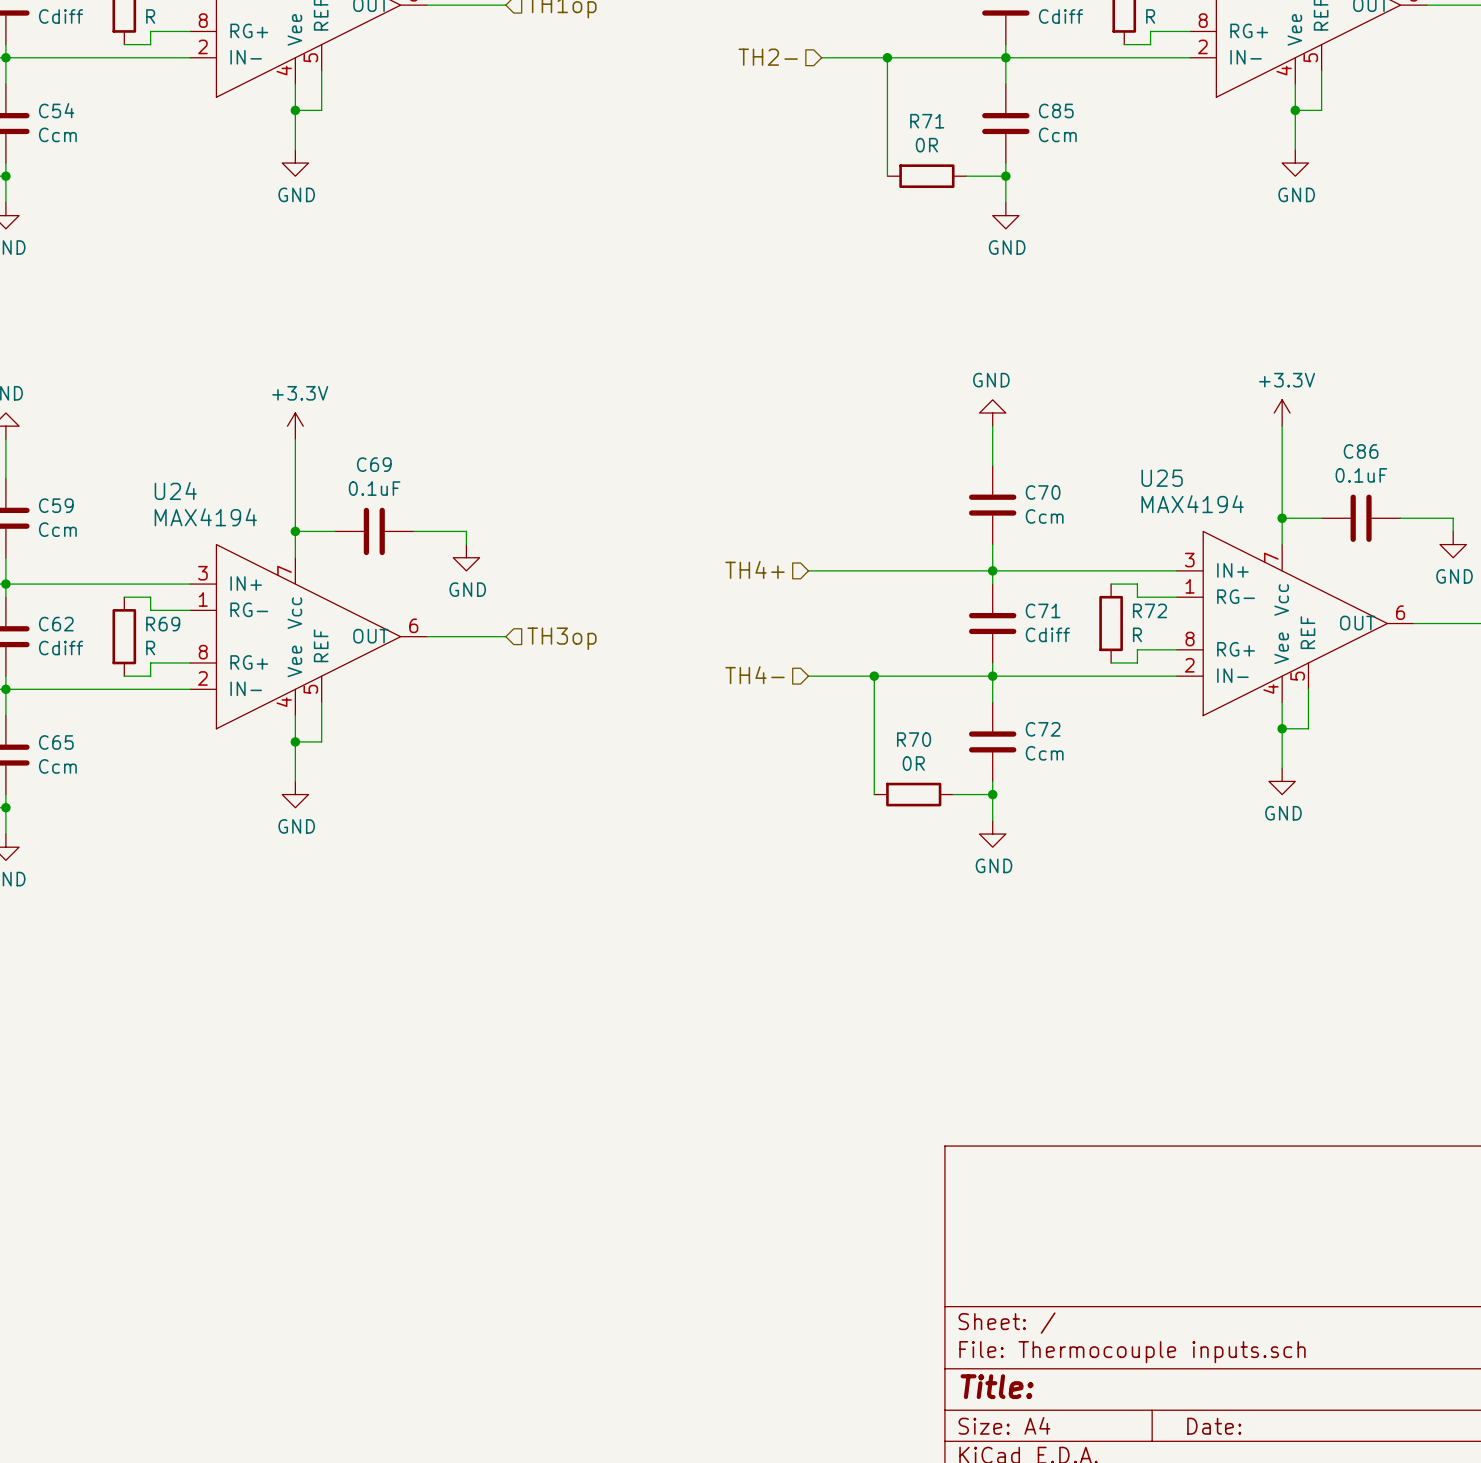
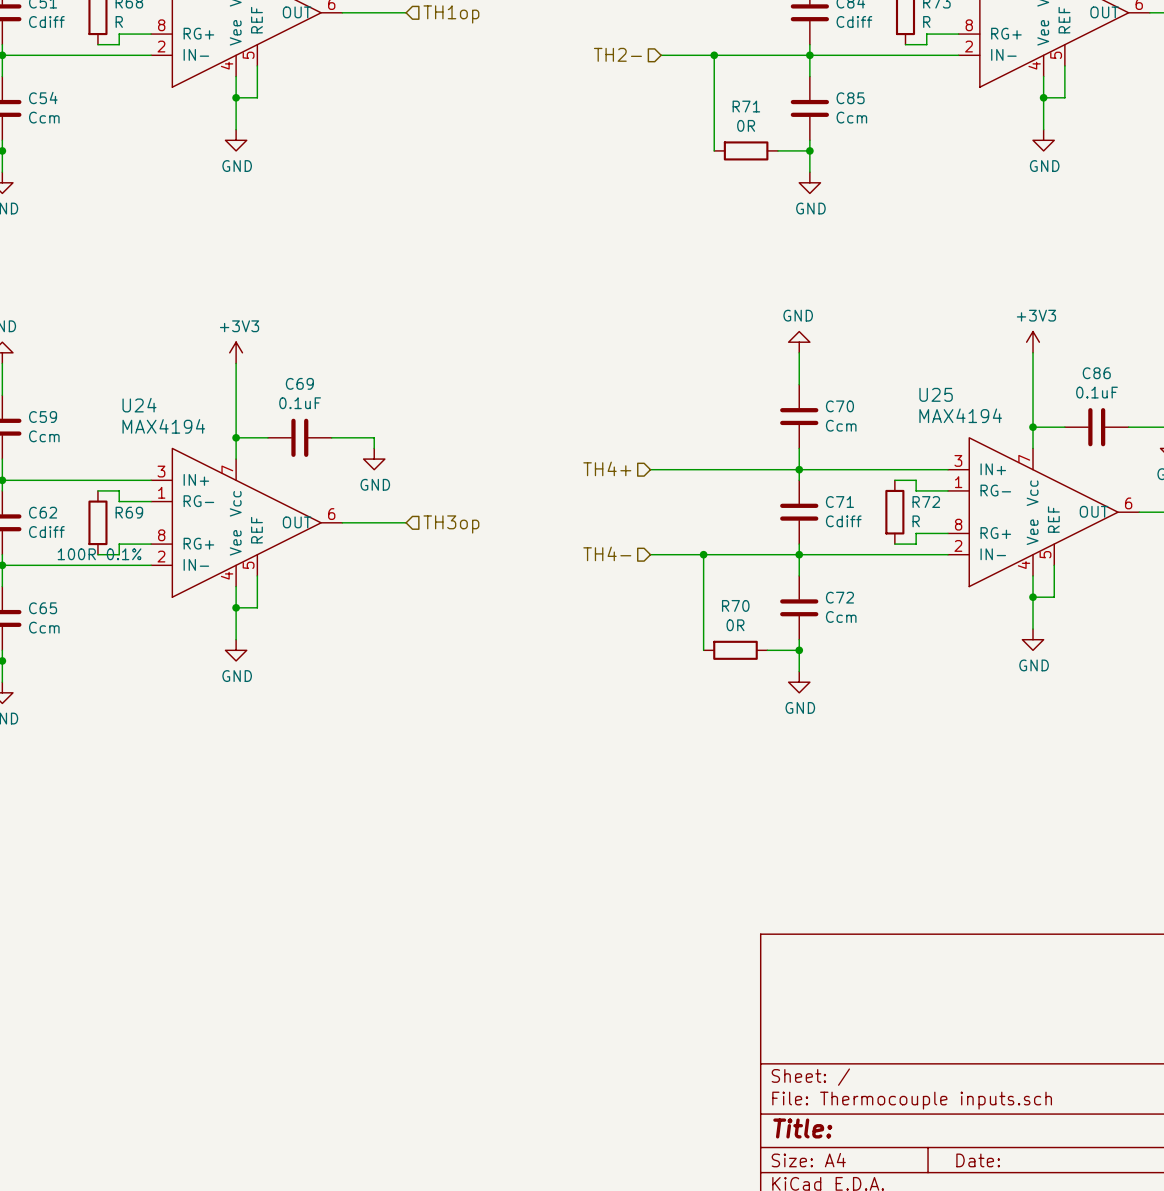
power symbol: +3.3V (1282, 413) -> +3V3 (1033, 342)
power symbol: +3.3V (295, 426) -> +3V3 (236, 352)
R69 value: R (150, 648) -> 100R 0.1% (99, 554)

